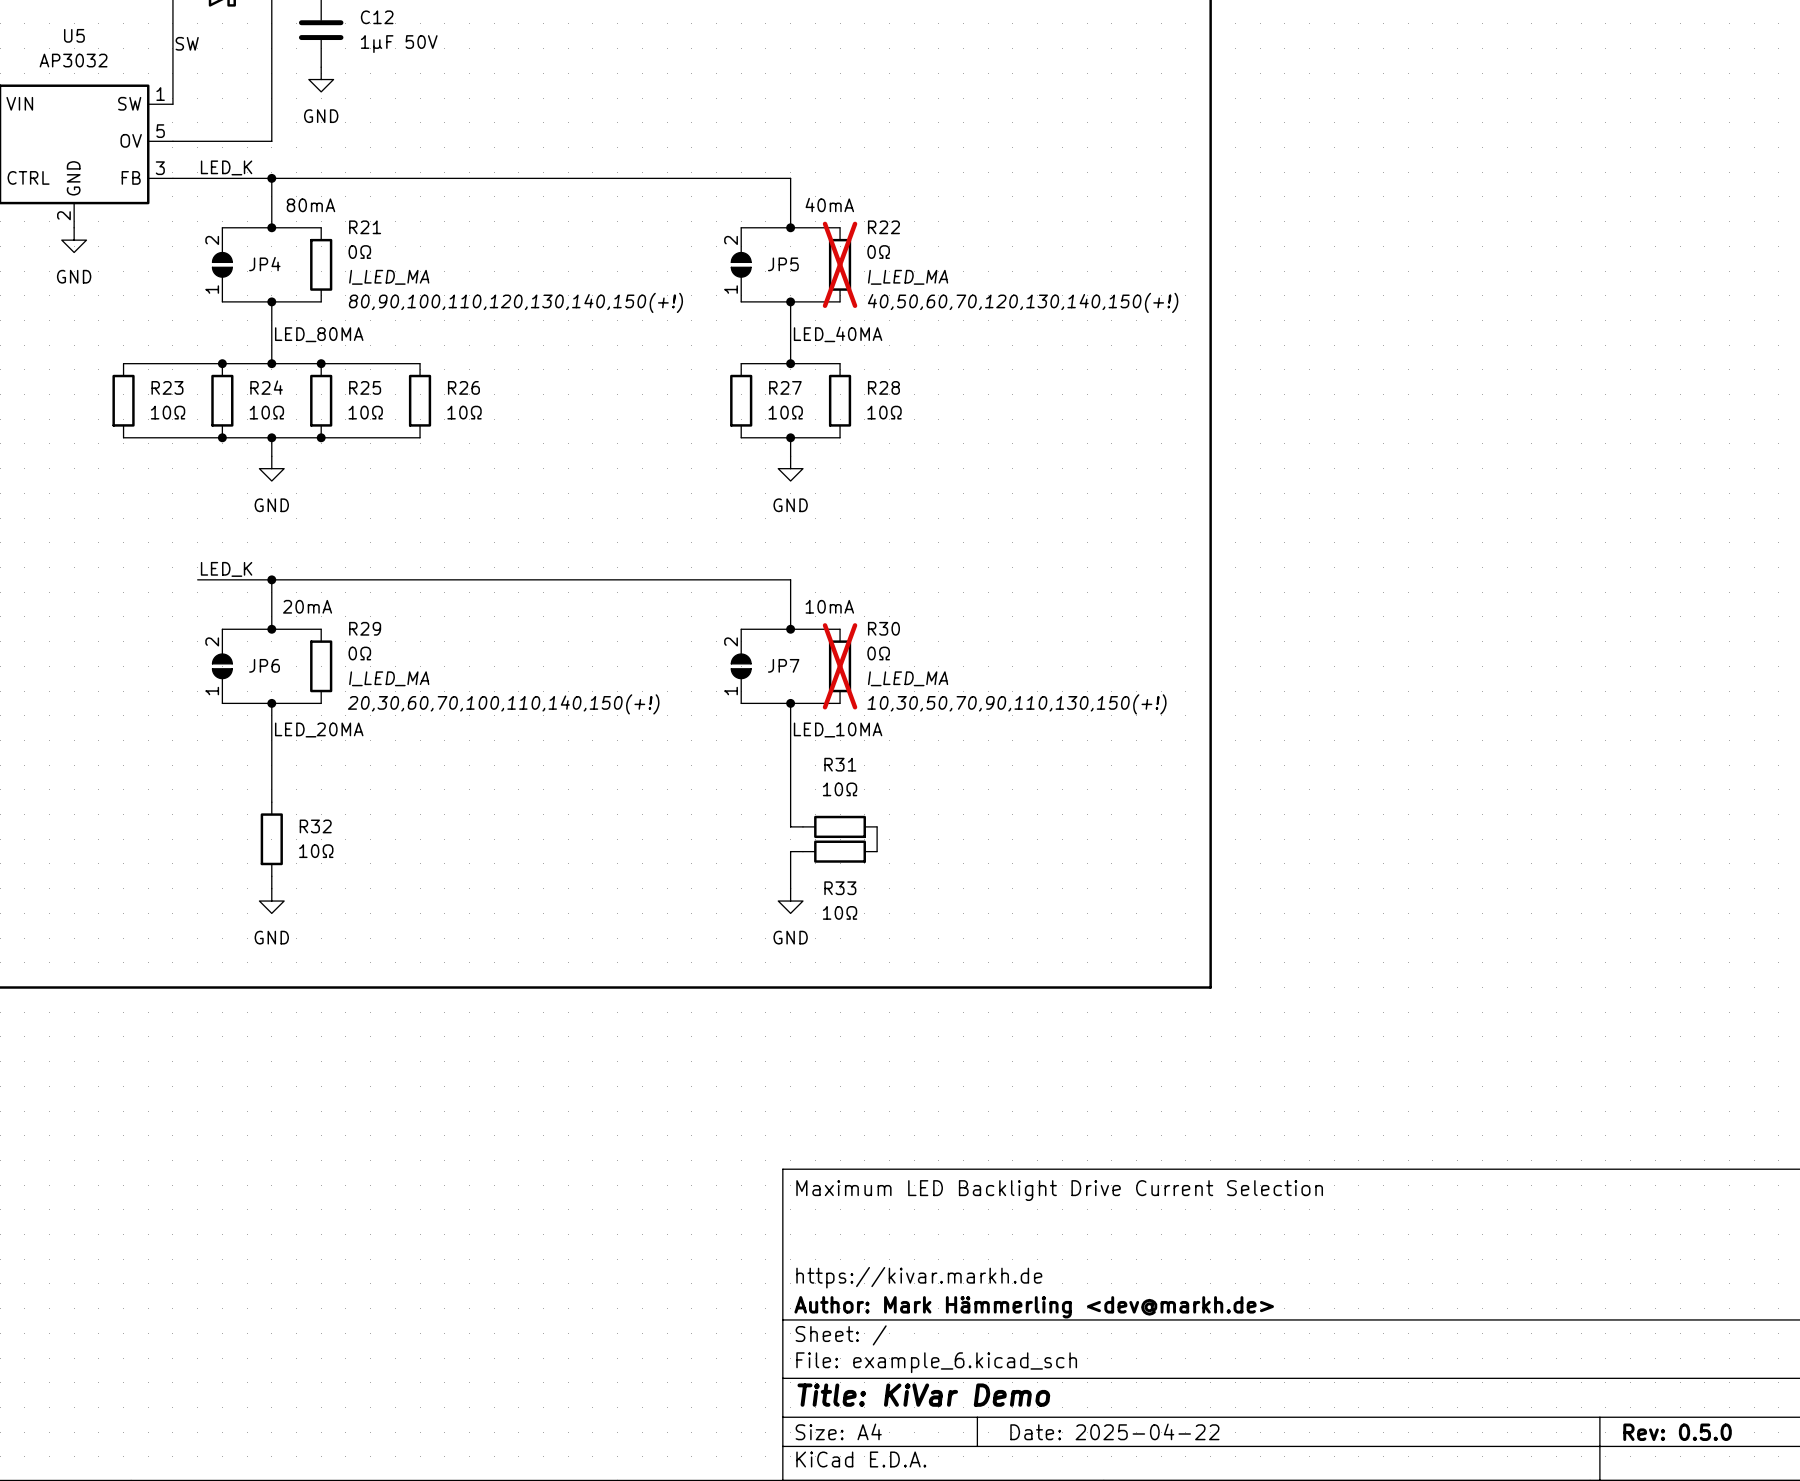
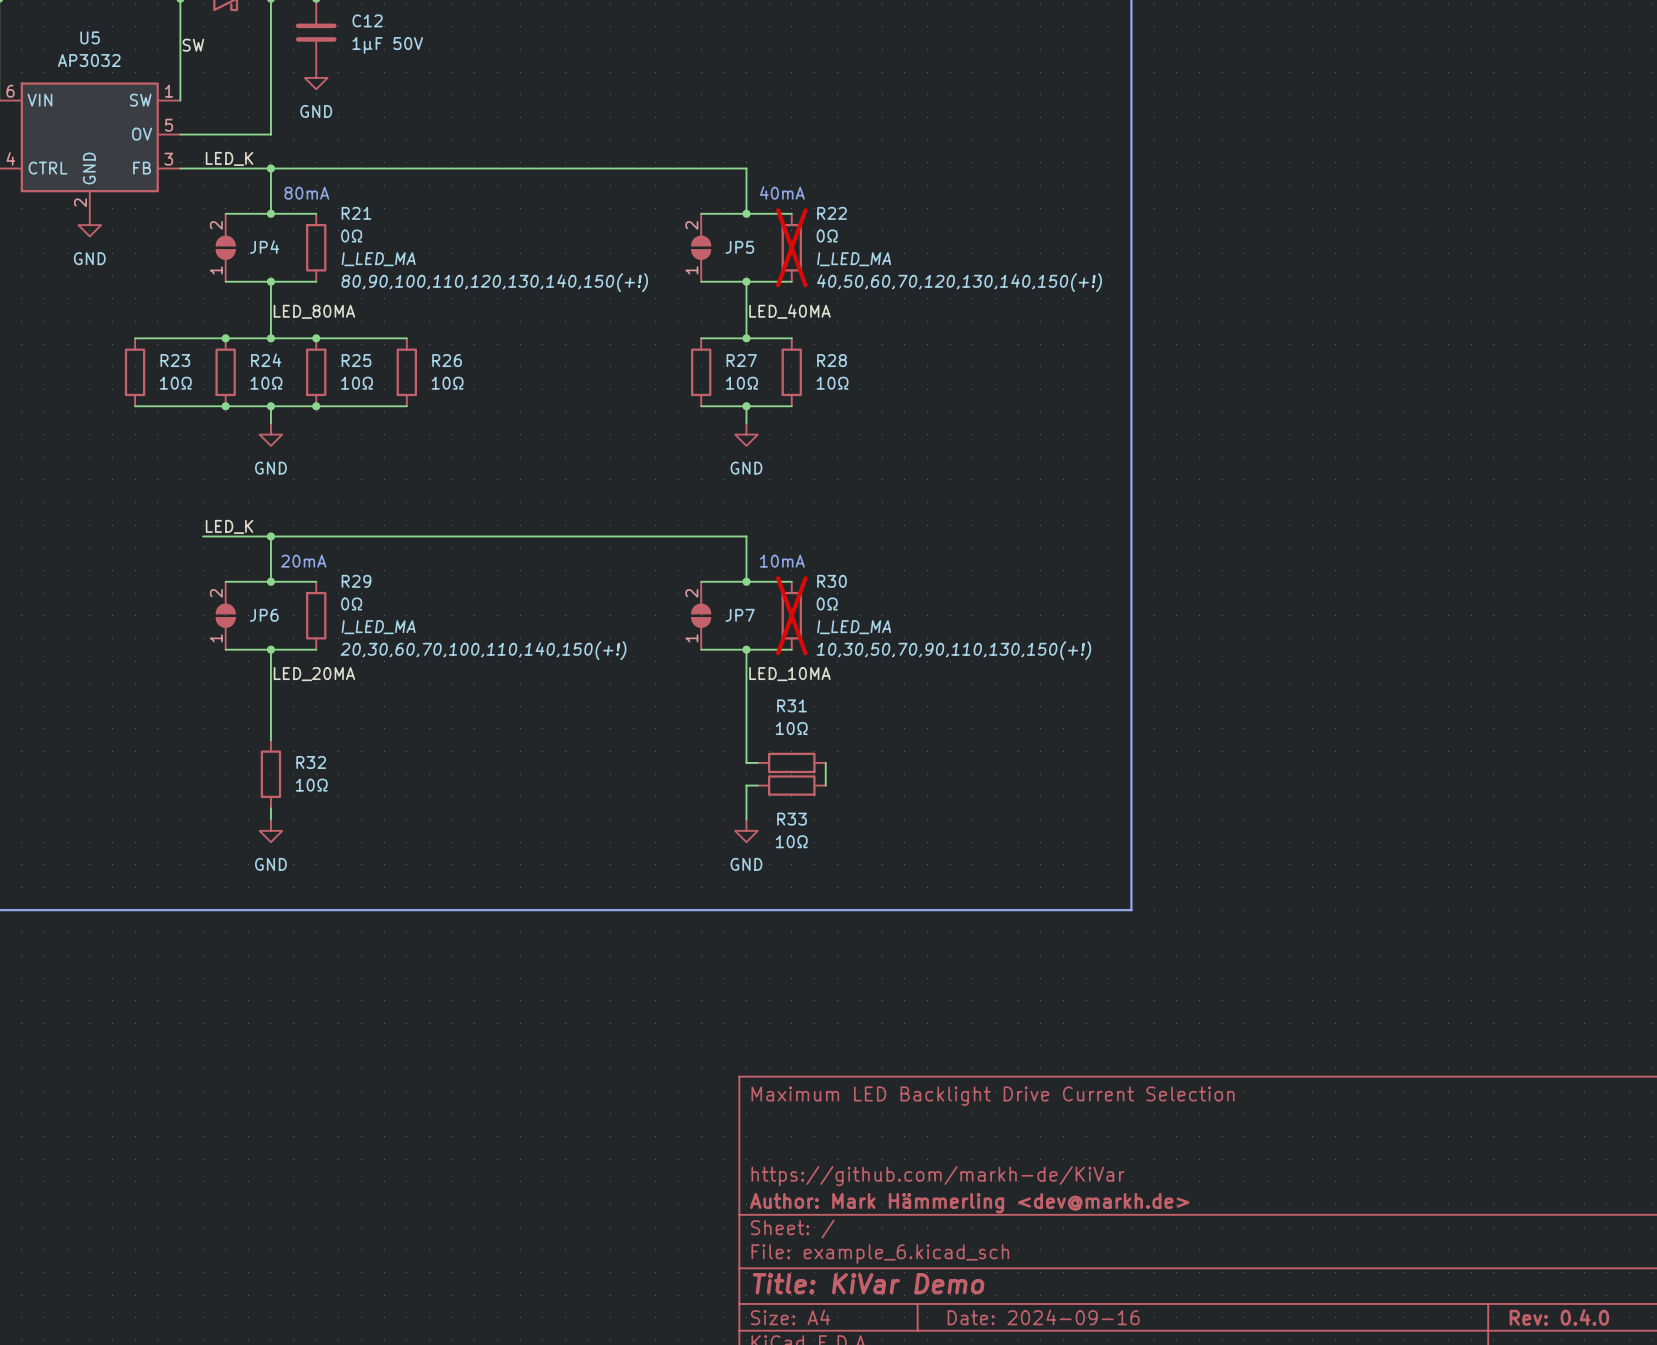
title block: https://kivar.markh.de (919, 1277) -> https://github.com/markh-de/KiVar (937, 1176)
title block: Date: 2025-04-22 (1114, 1431) -> Date: 2024-09-16 (1043, 1317)
title block: Rev: 0.5.0 (1677, 1432) -> Rev: 0.4.0 (1559, 1317)

